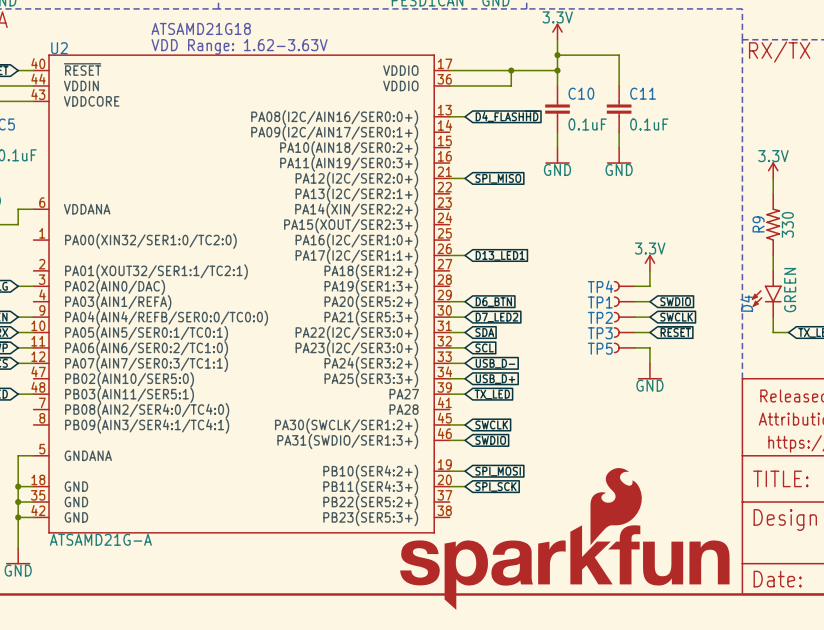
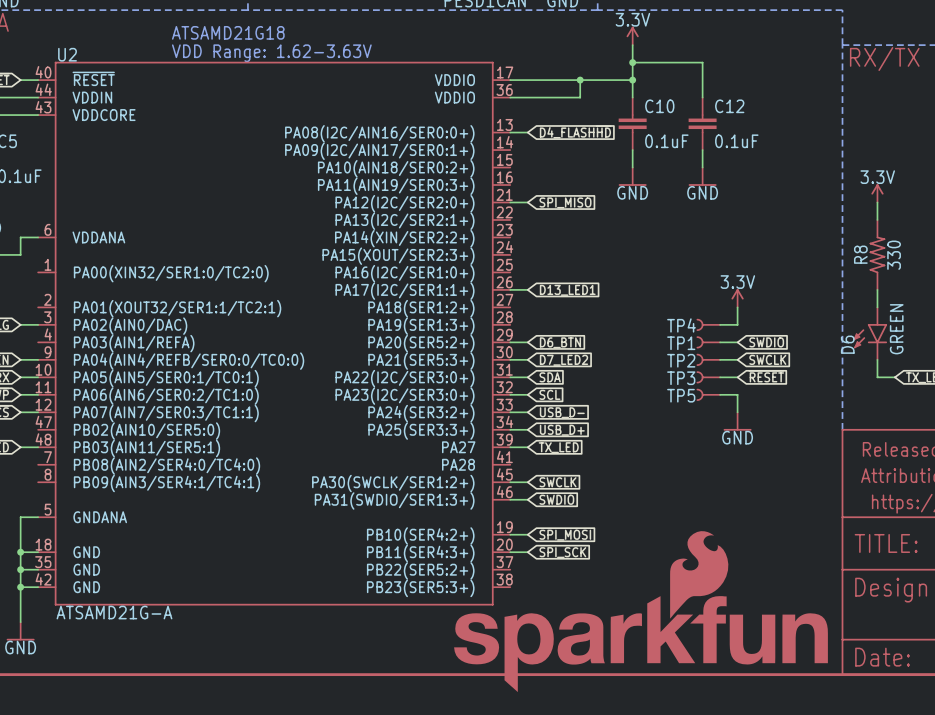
C11 name: C11 (643, 93) -> C12 (729, 106)
R9 name: R9 (758, 224) -> R8 (860, 254)
D4 name: D4 (746, 303) -> D6 (847, 344)

